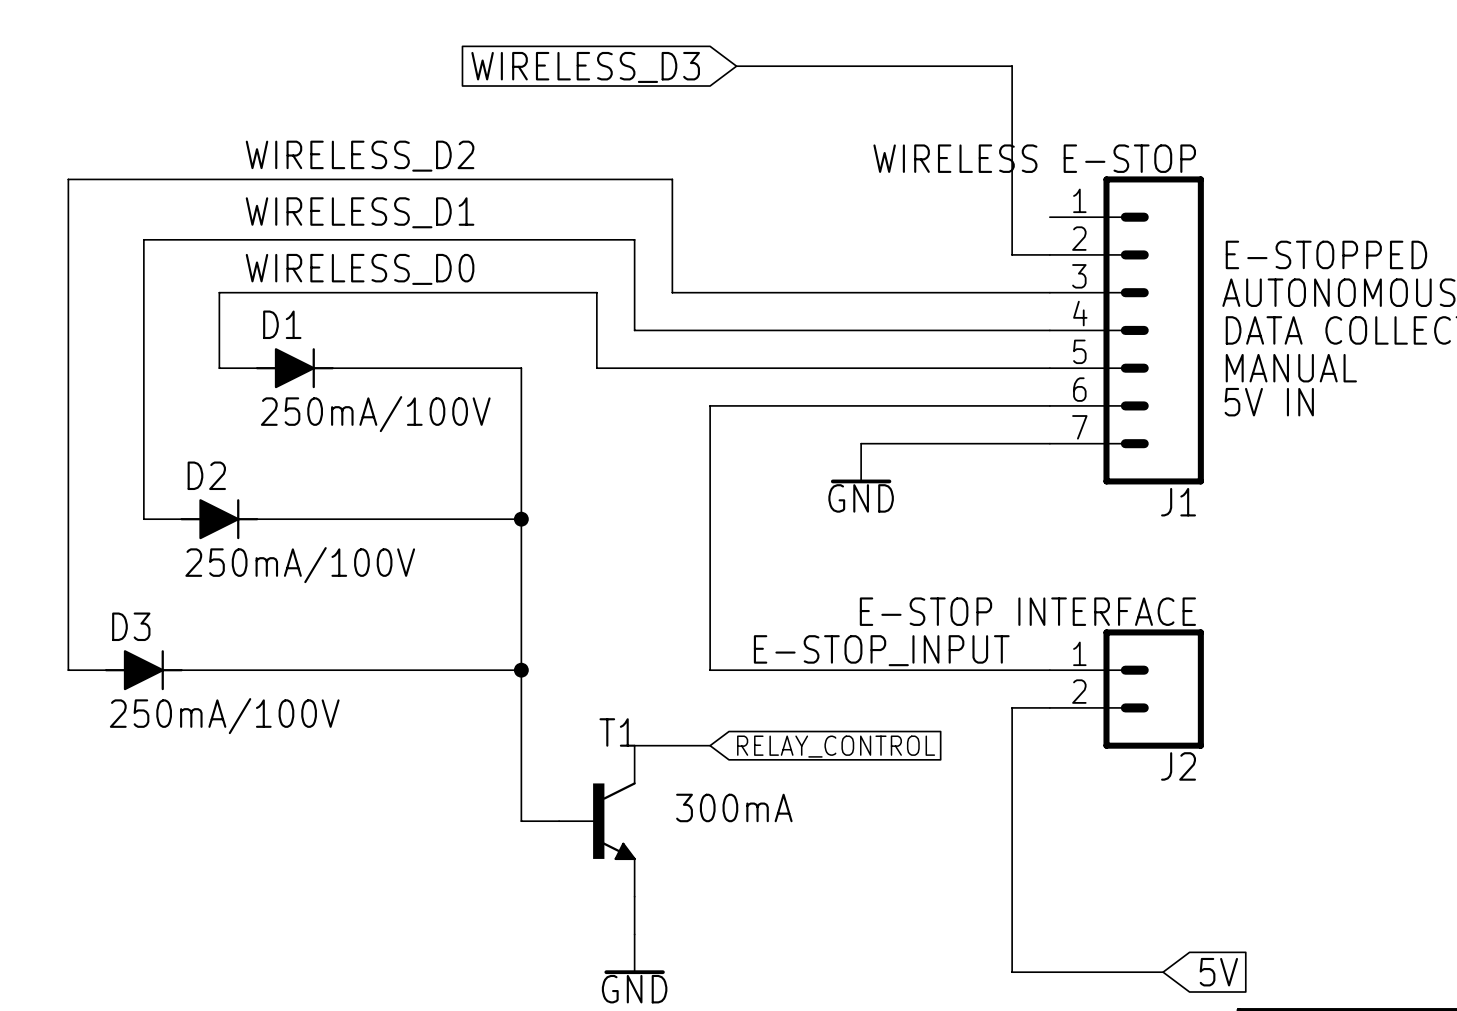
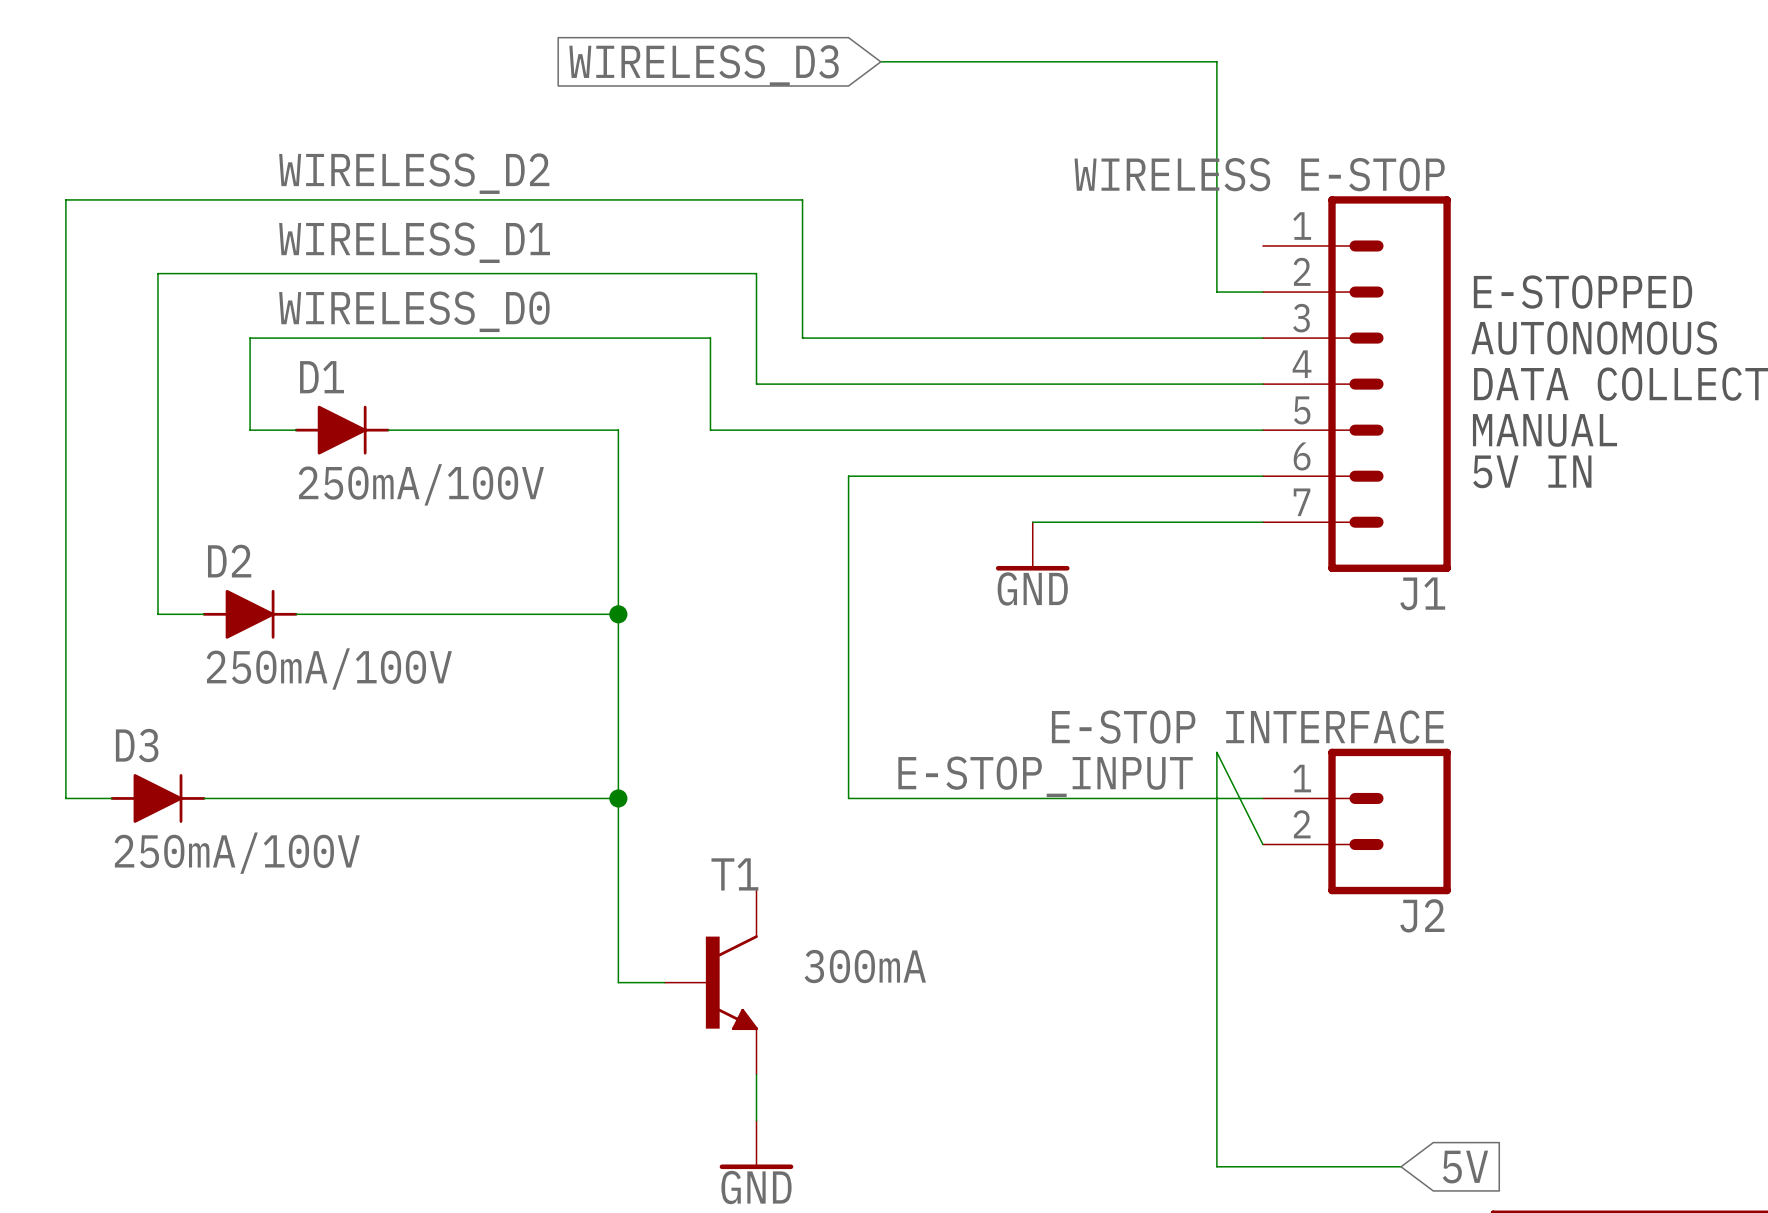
wire: (1012, 707) (1049, 707) -> (1216, 844) (1216, 752) (1262, 844)
wire: (634, 745) (710, 745) -> none
global label: RELAY_CONTROL (836, 746) -> none

